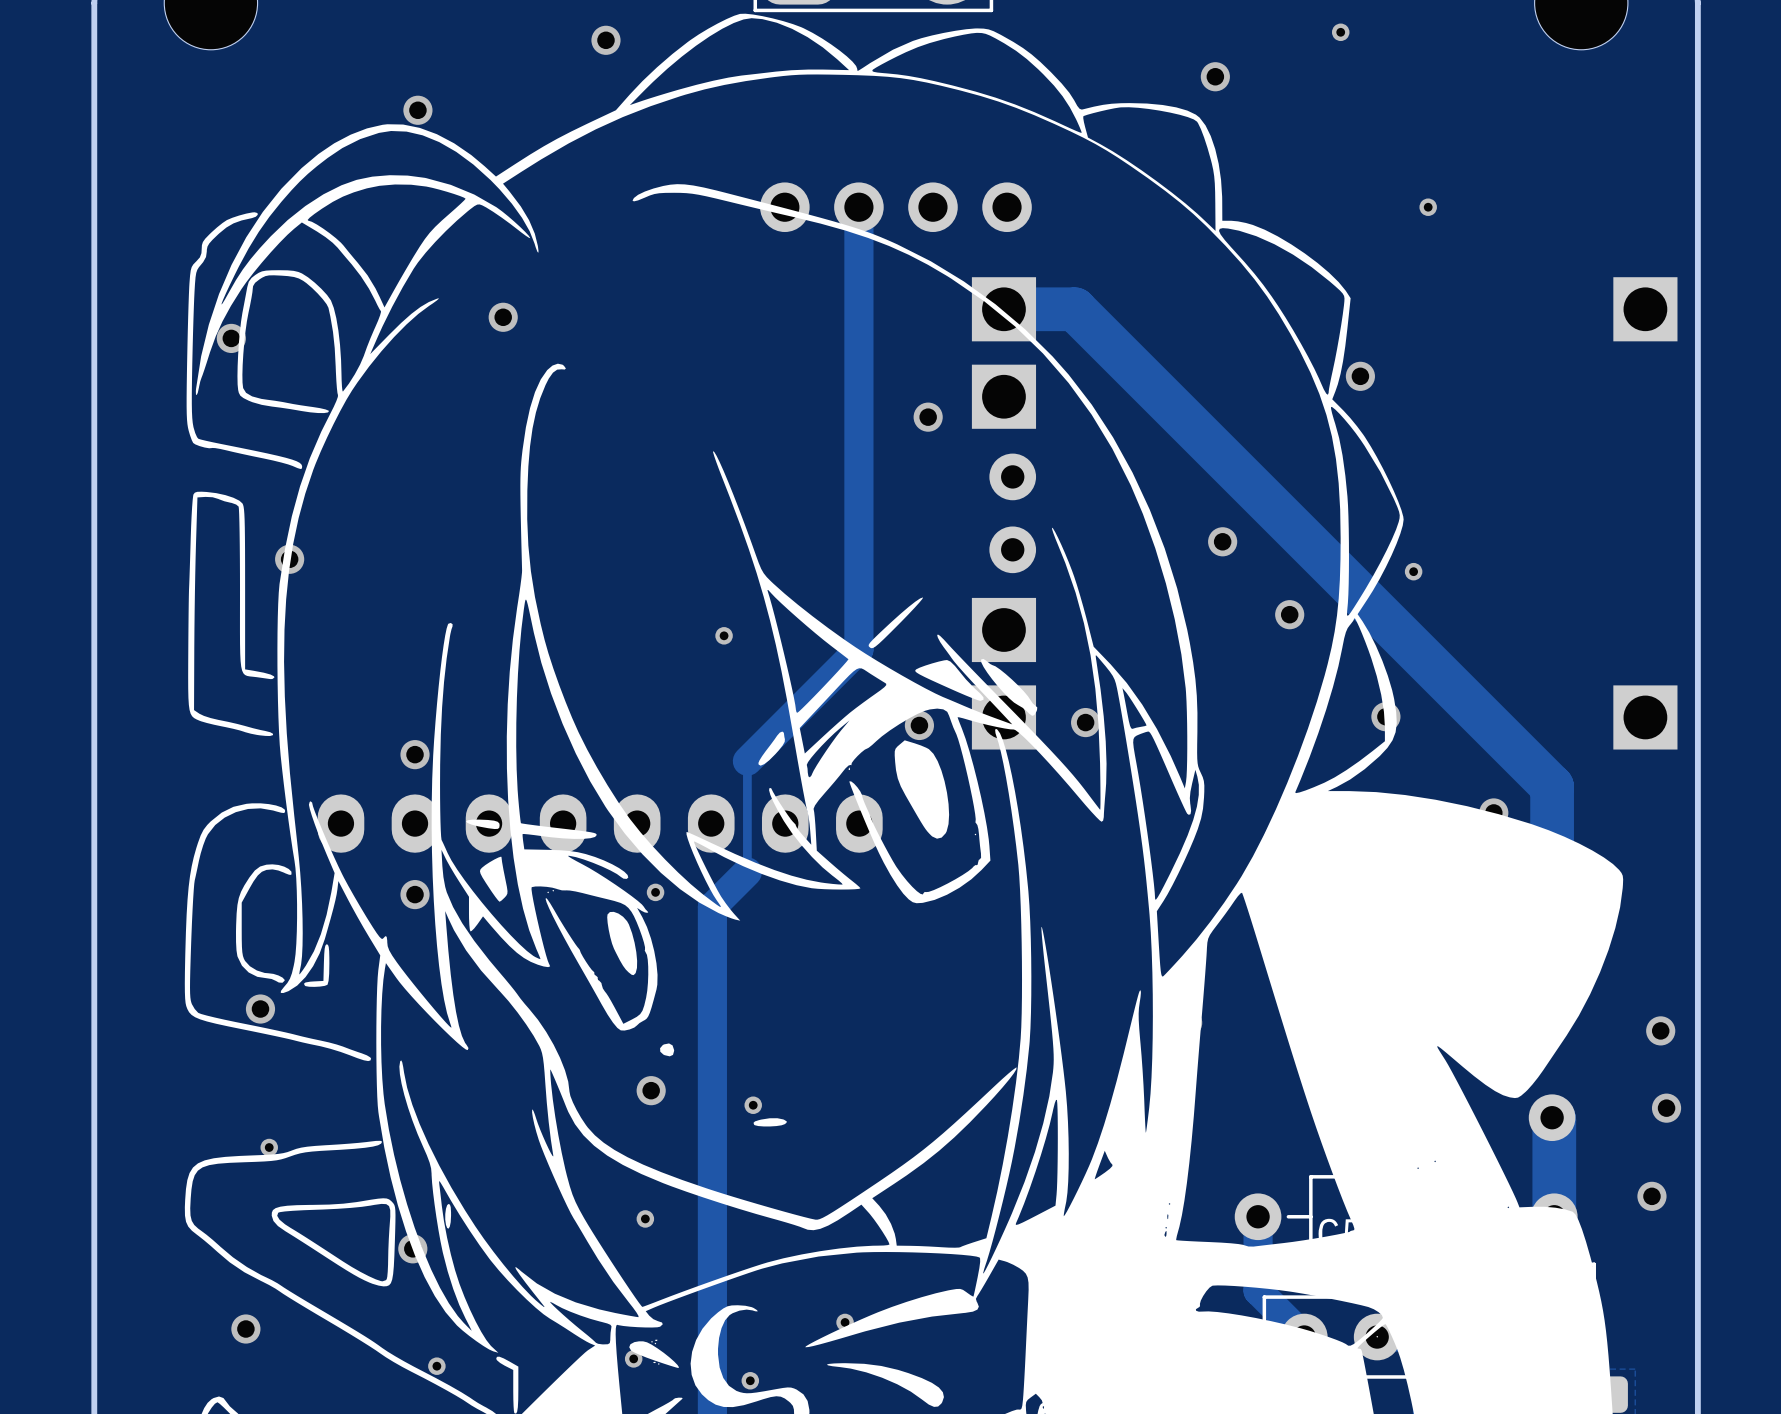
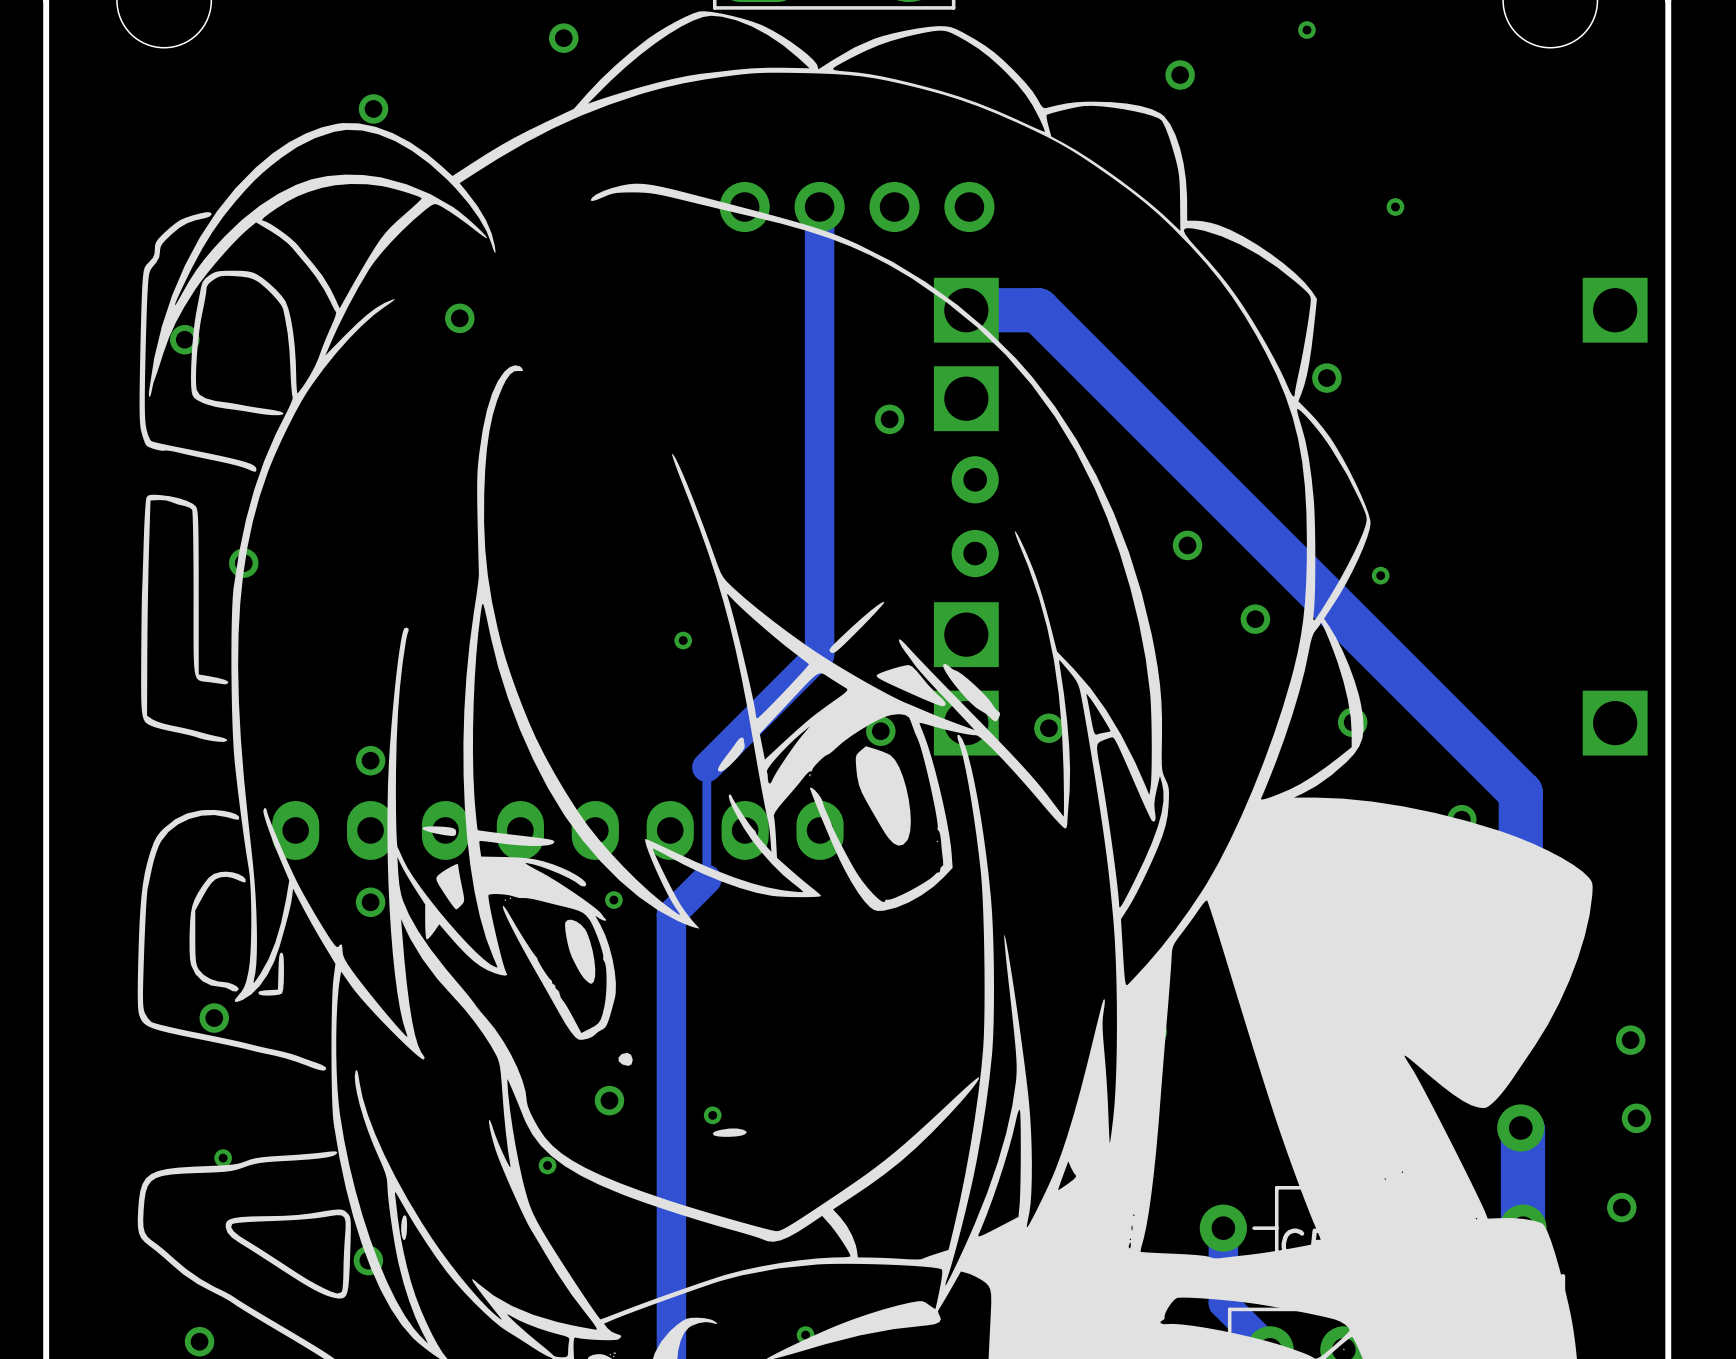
via position: (645, 1218) -> (547, 1165)

